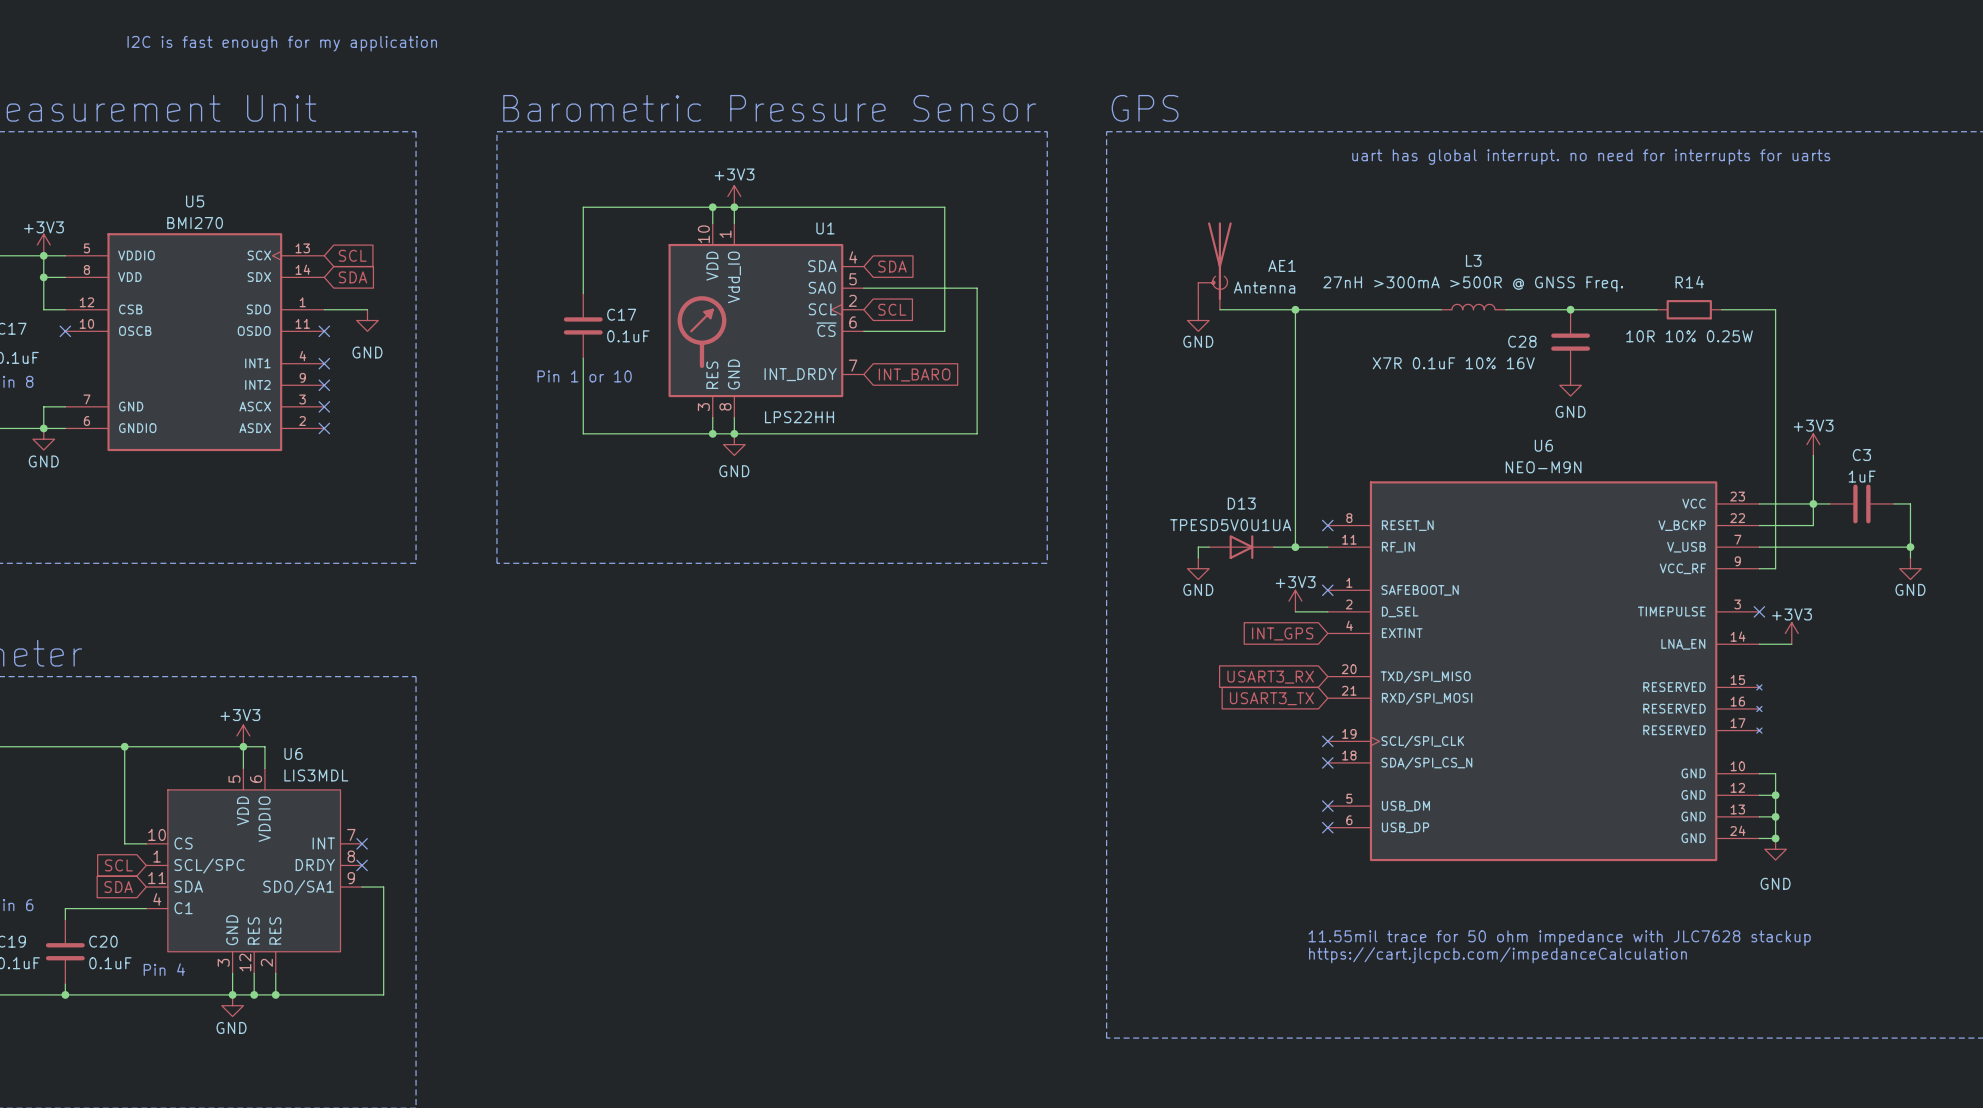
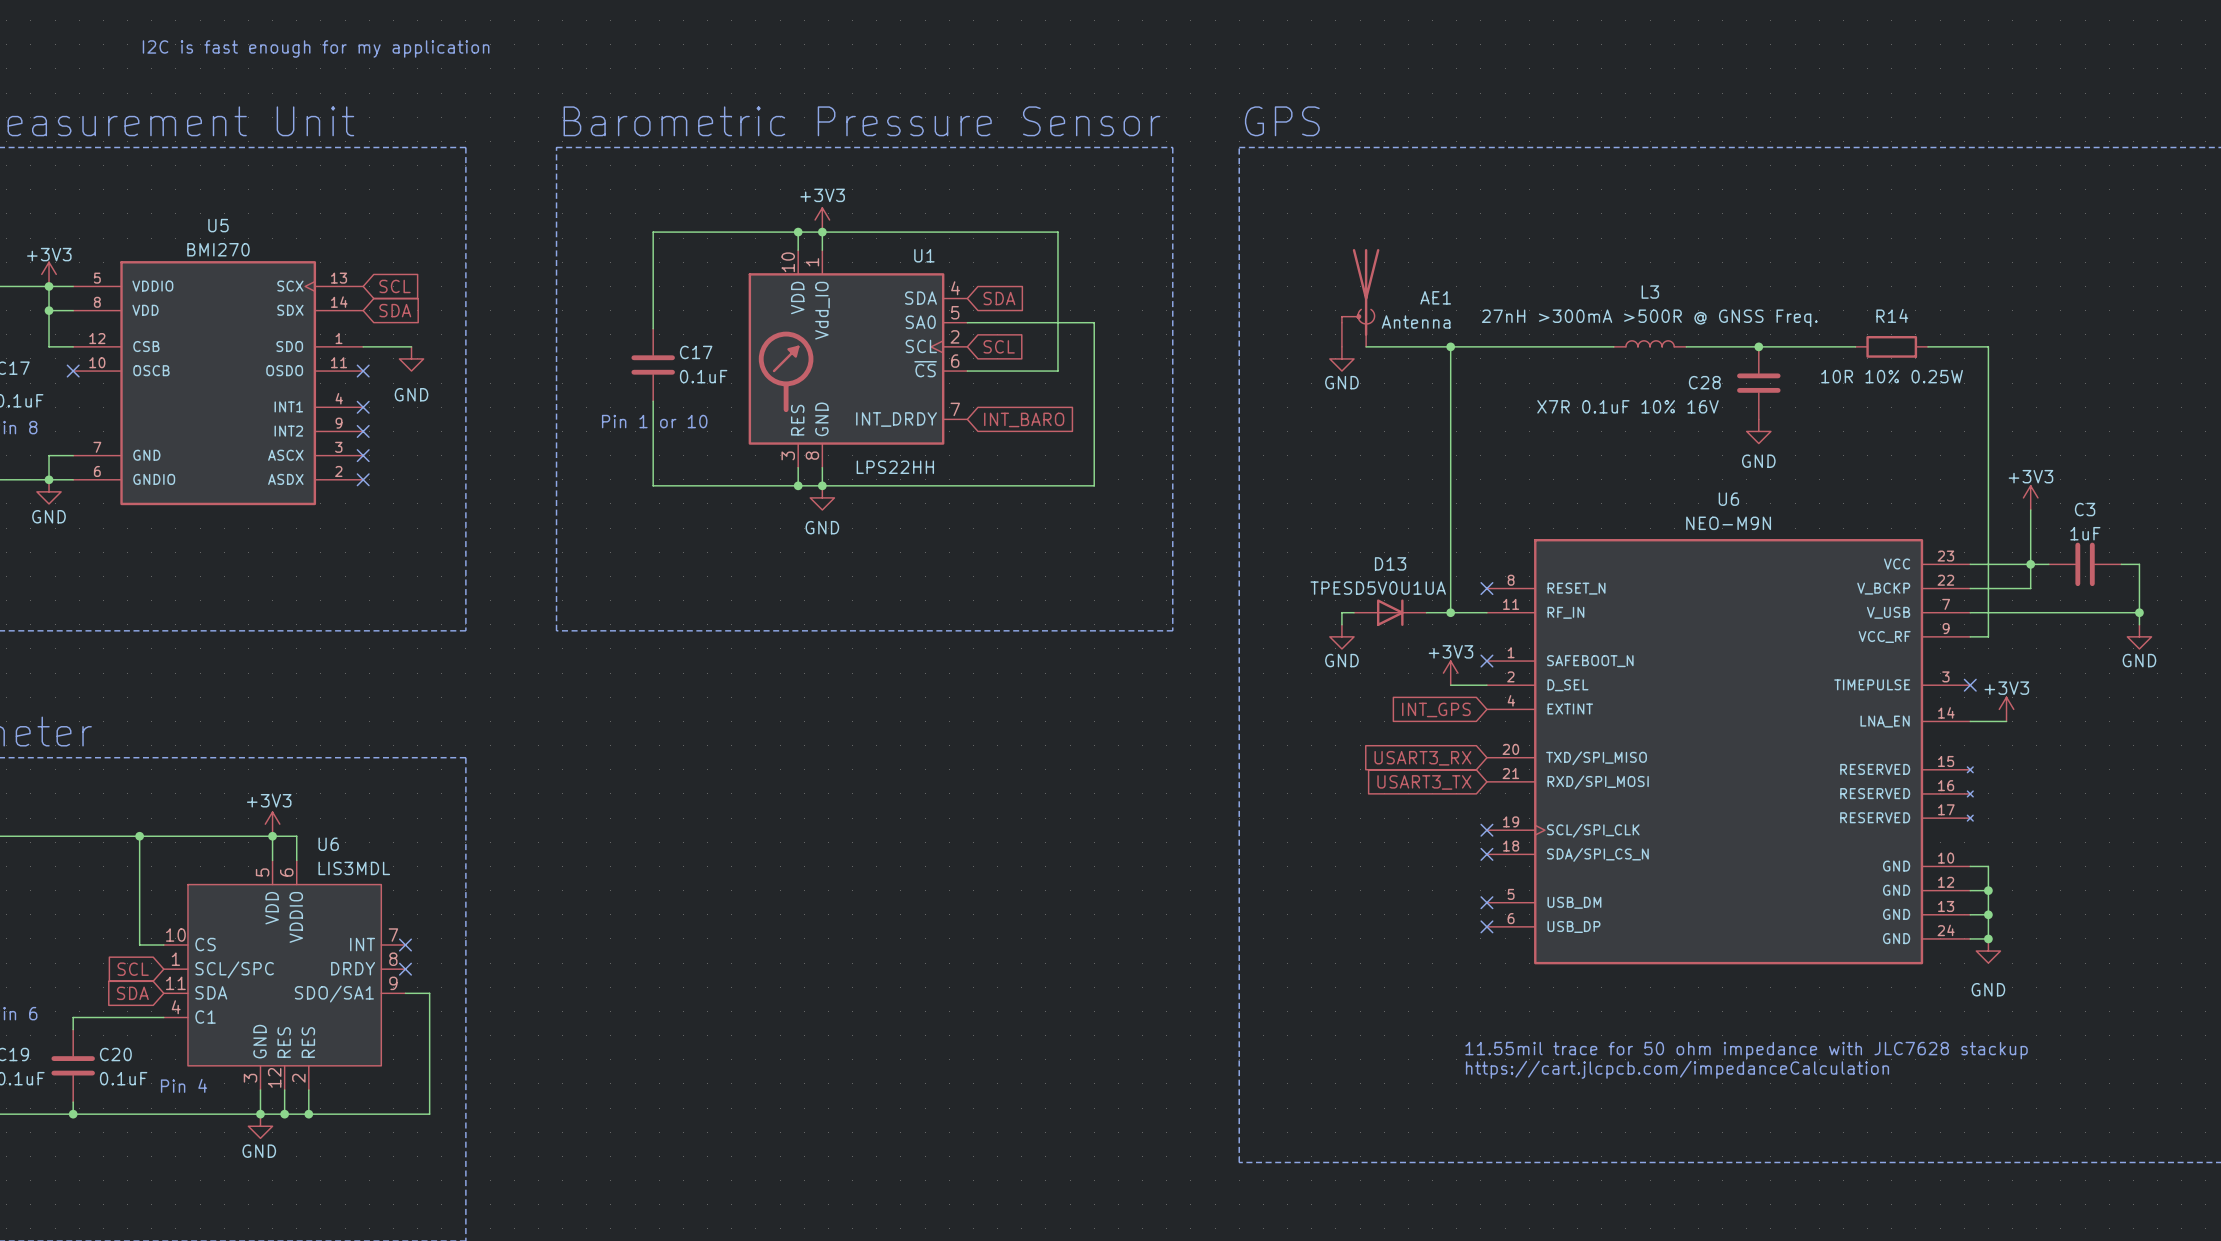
text: uart has global interrupt. no need for interrupts for uarts (1591, 157) -> none

